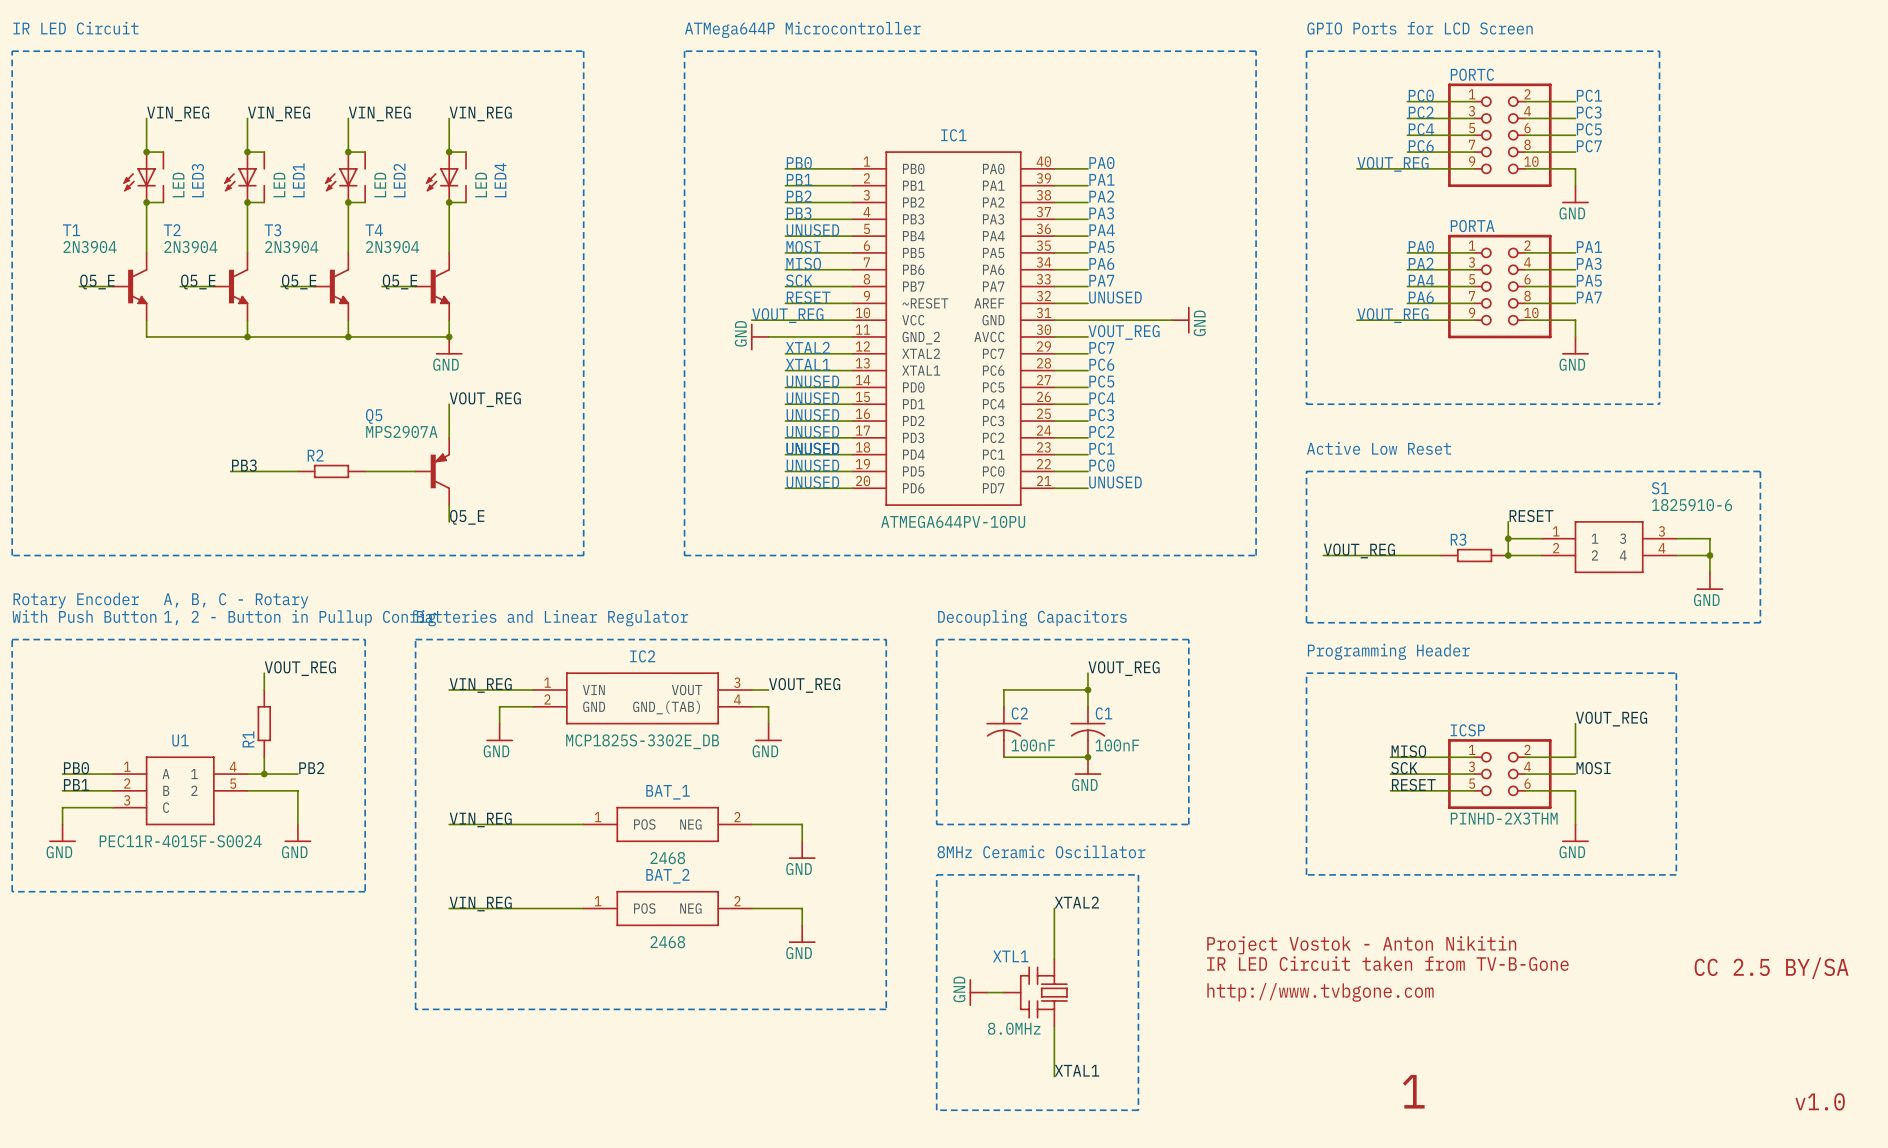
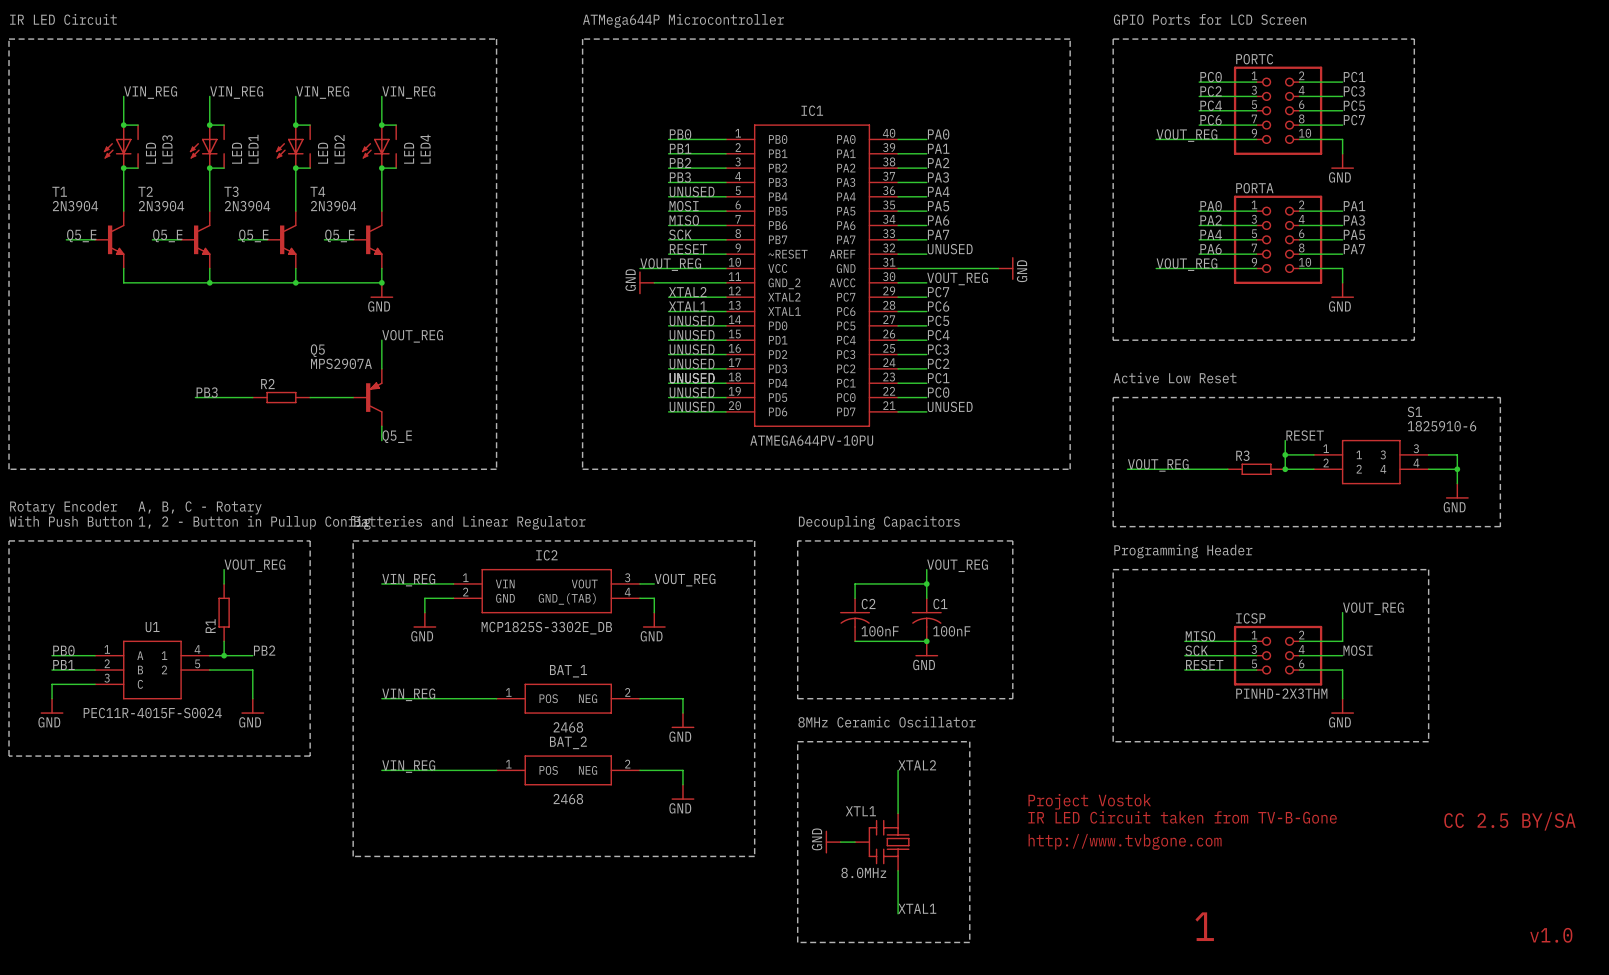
text: Project Vostok - Anton Nikitin (1361, 945) -> Project Vostok (1089, 801)

